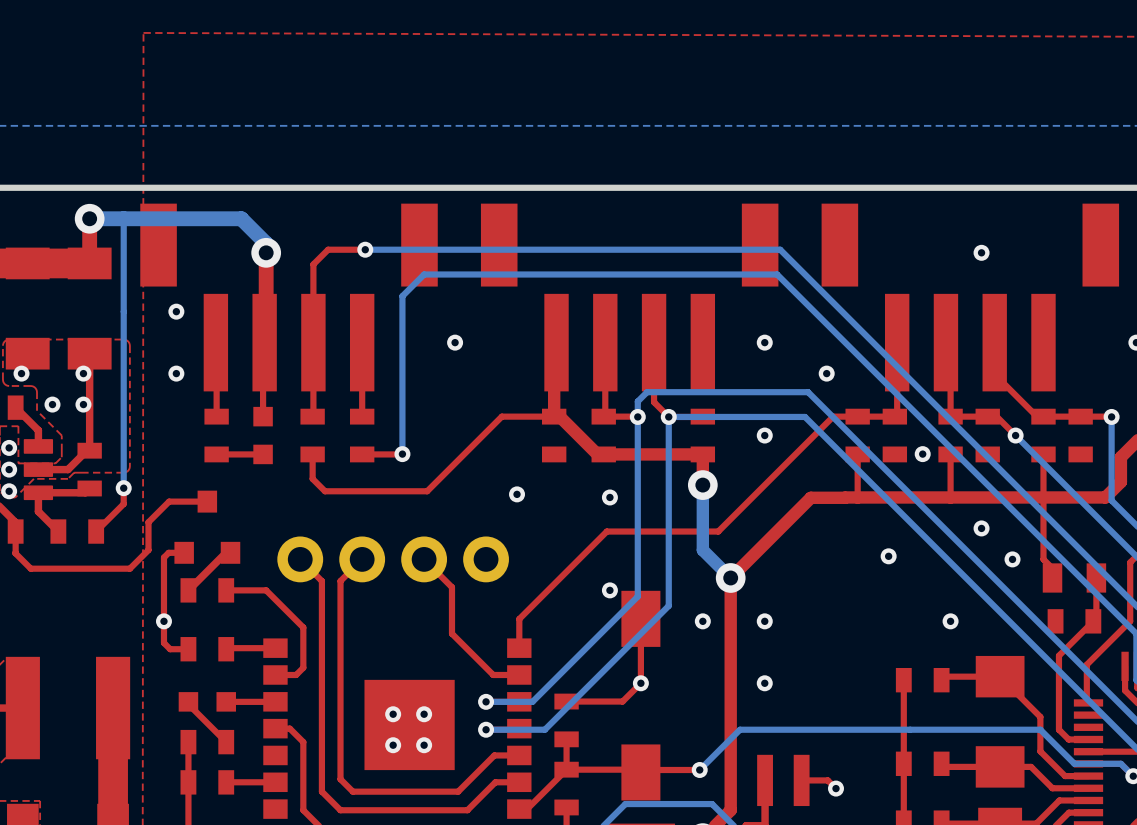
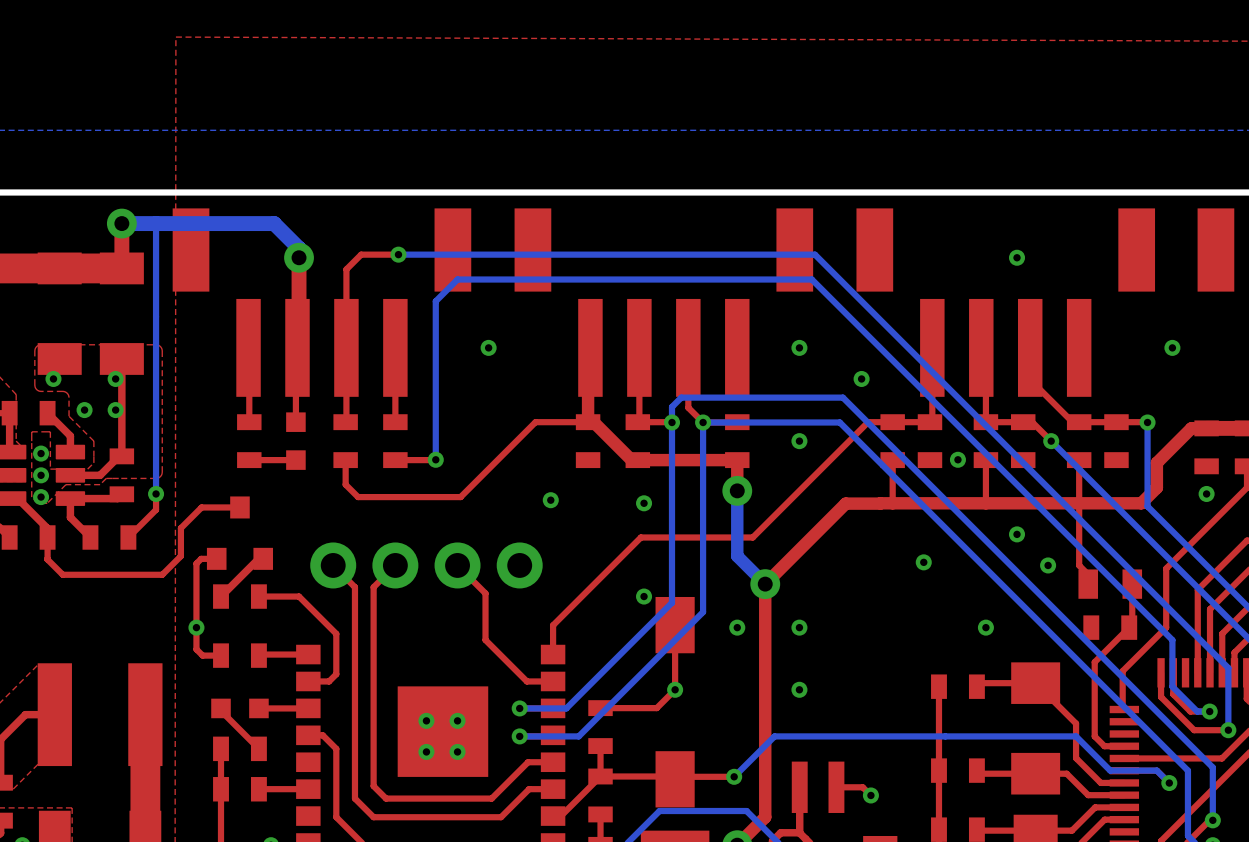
via: (176, 311) -> none
via: (176, 373) -> none

